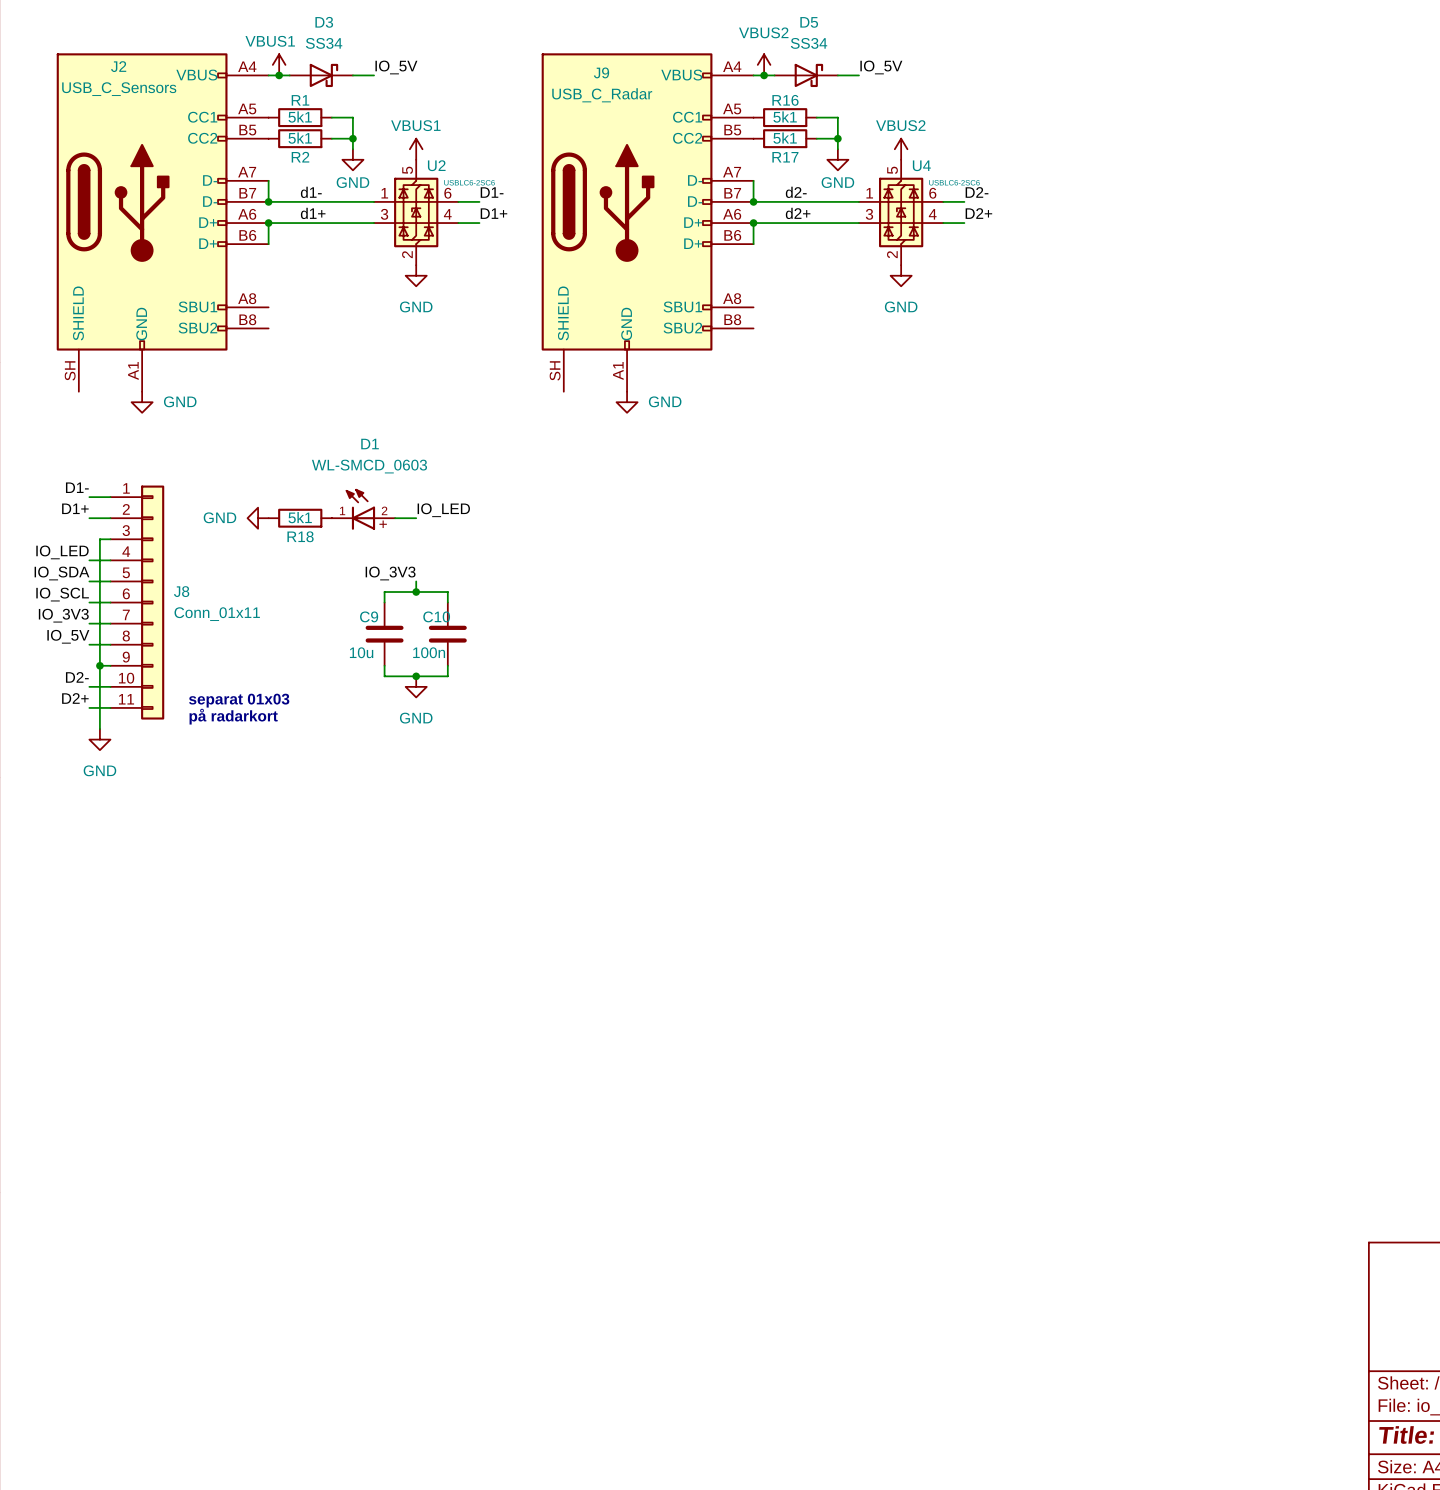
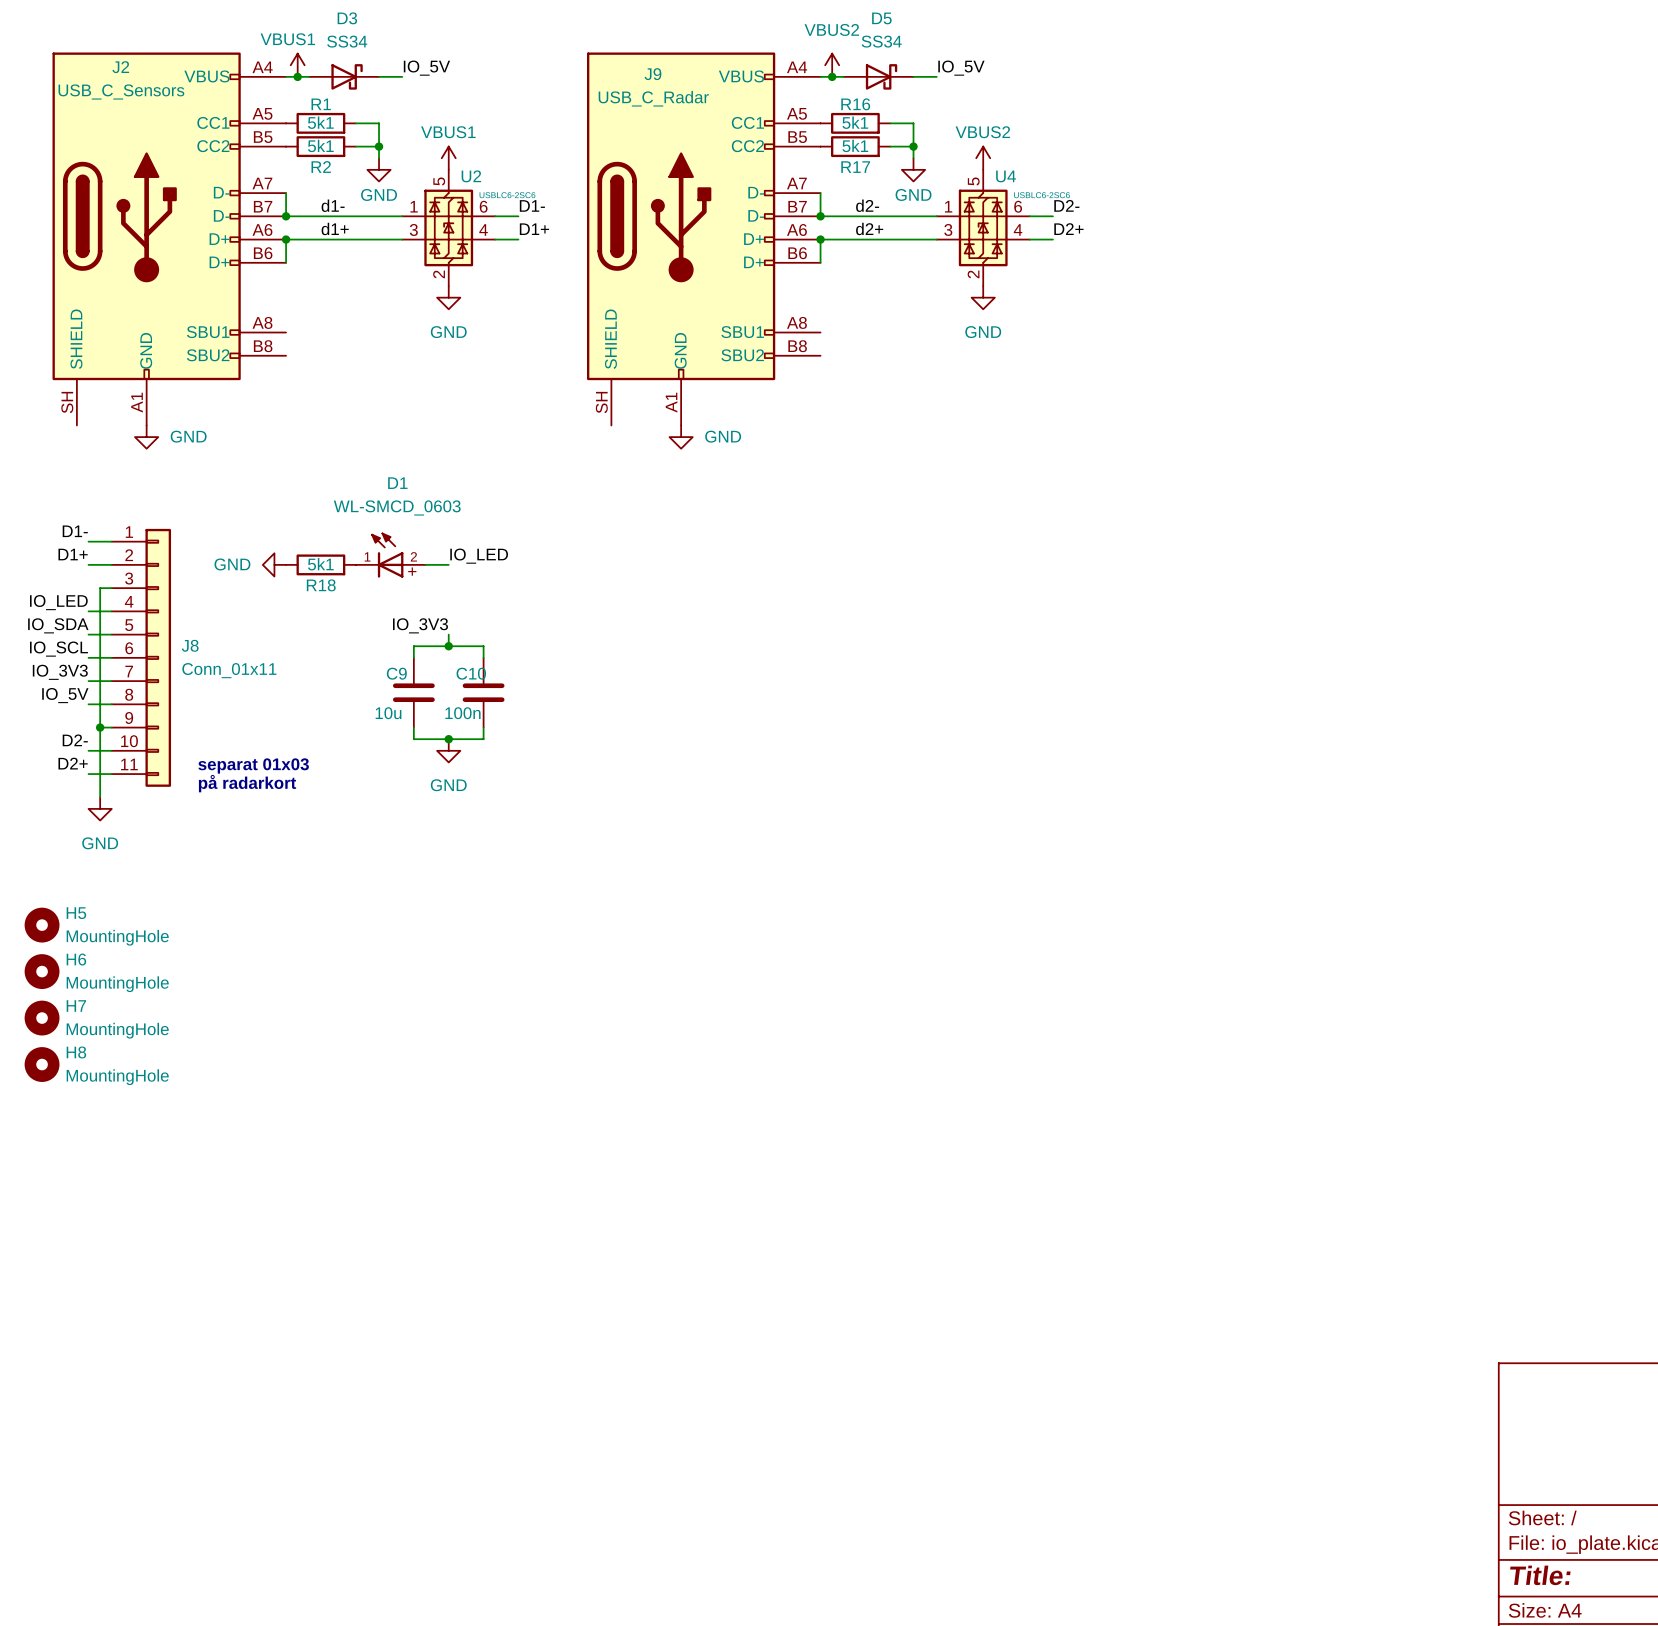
H5: none -> MountingHole (42, 925)
H6: none -> MountingHole (42, 971)
H7: none -> MountingHole (42, 1018)
H8: none -> MountingHole (42, 1064)

